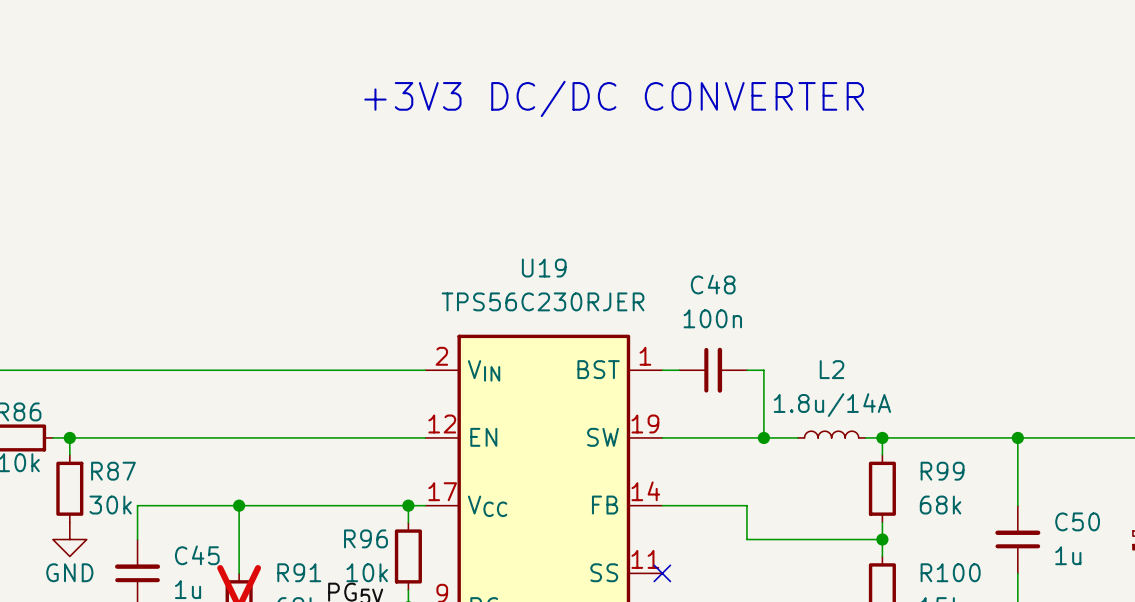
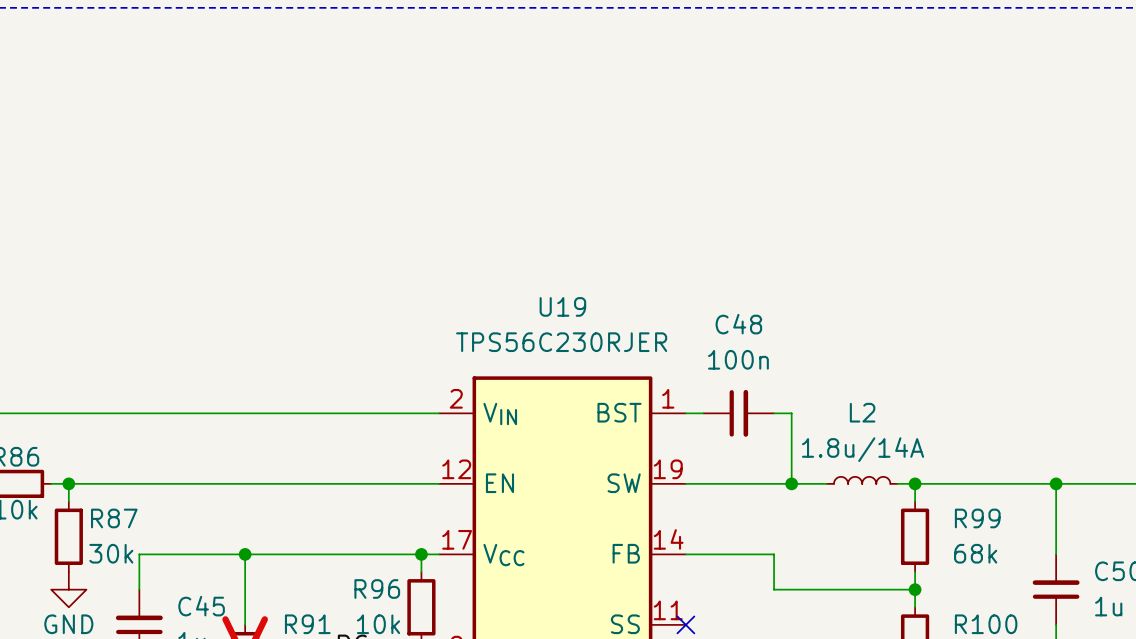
text: +3V3 DC/DC CONVERTER (614, 98) -> none

